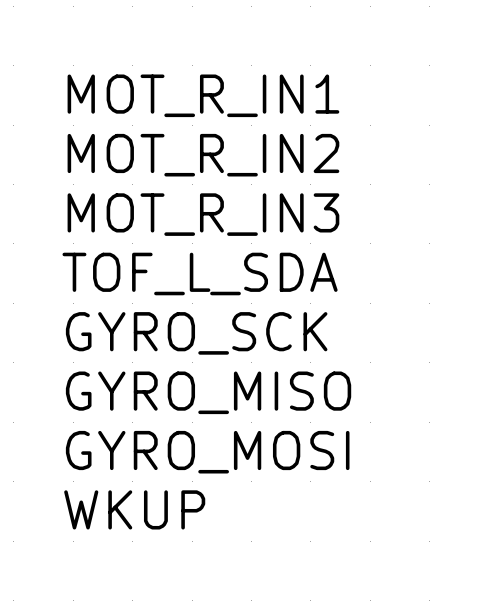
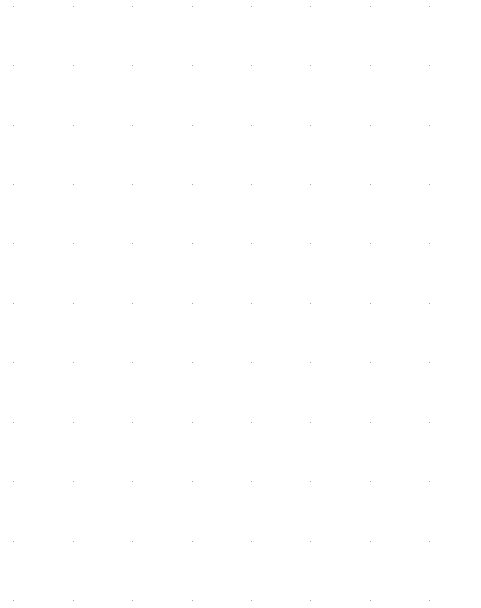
label: MOT_R_IN1 (203, 95) -> none
label: MOT_R_IN2 (203, 155) -> none
label: MOT_R_IN3 (203, 214) -> none
label: TOF_L_SDA (200, 273) -> none
label: GYRO_SCK (196, 333) -> none
label: GYRO_MISO (208, 392) -> none
label: GYRO_MOSI (207, 452) -> none
label: WKUP (134, 509) -> none

